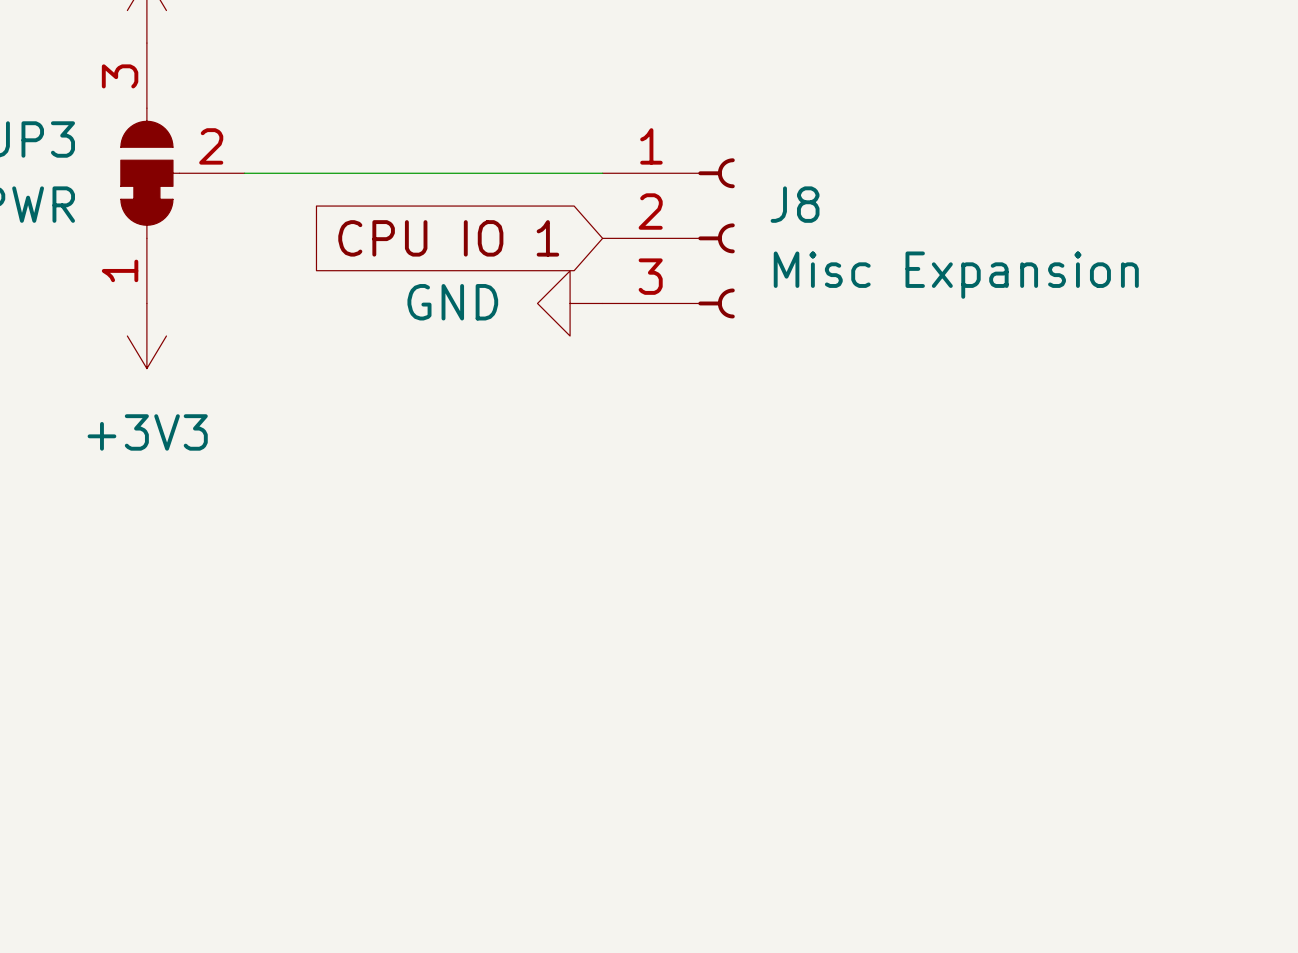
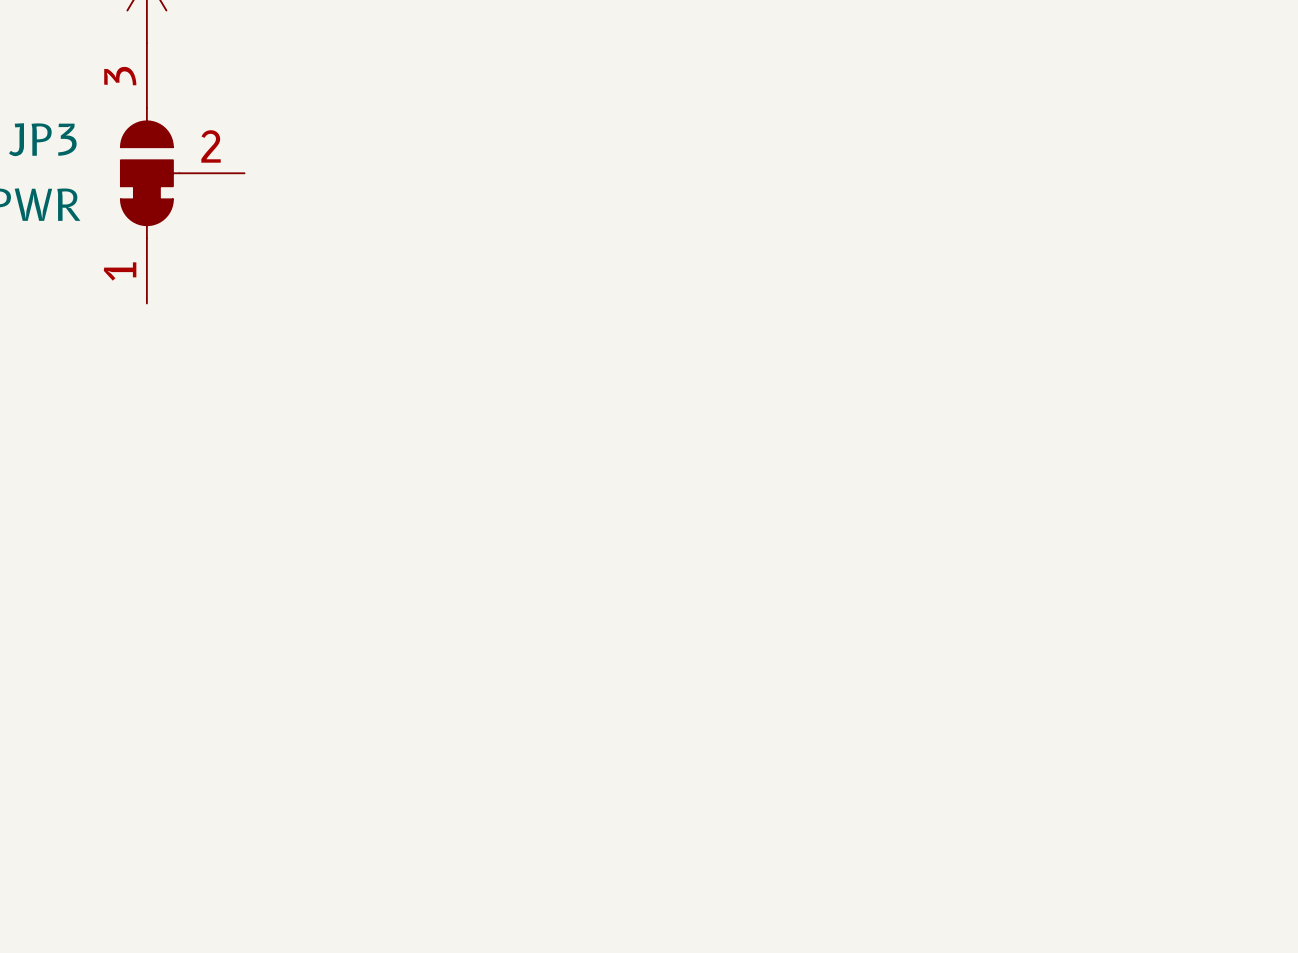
wire: (244, 173) (602, 173) -> none
global label: CPU IO 1 (448, 238) -> none
J8: Misc Expansion (668, 238) -> none
power symbol: GND (570, 303) -> none
power symbol: +3V3 (146, 336) -> none

